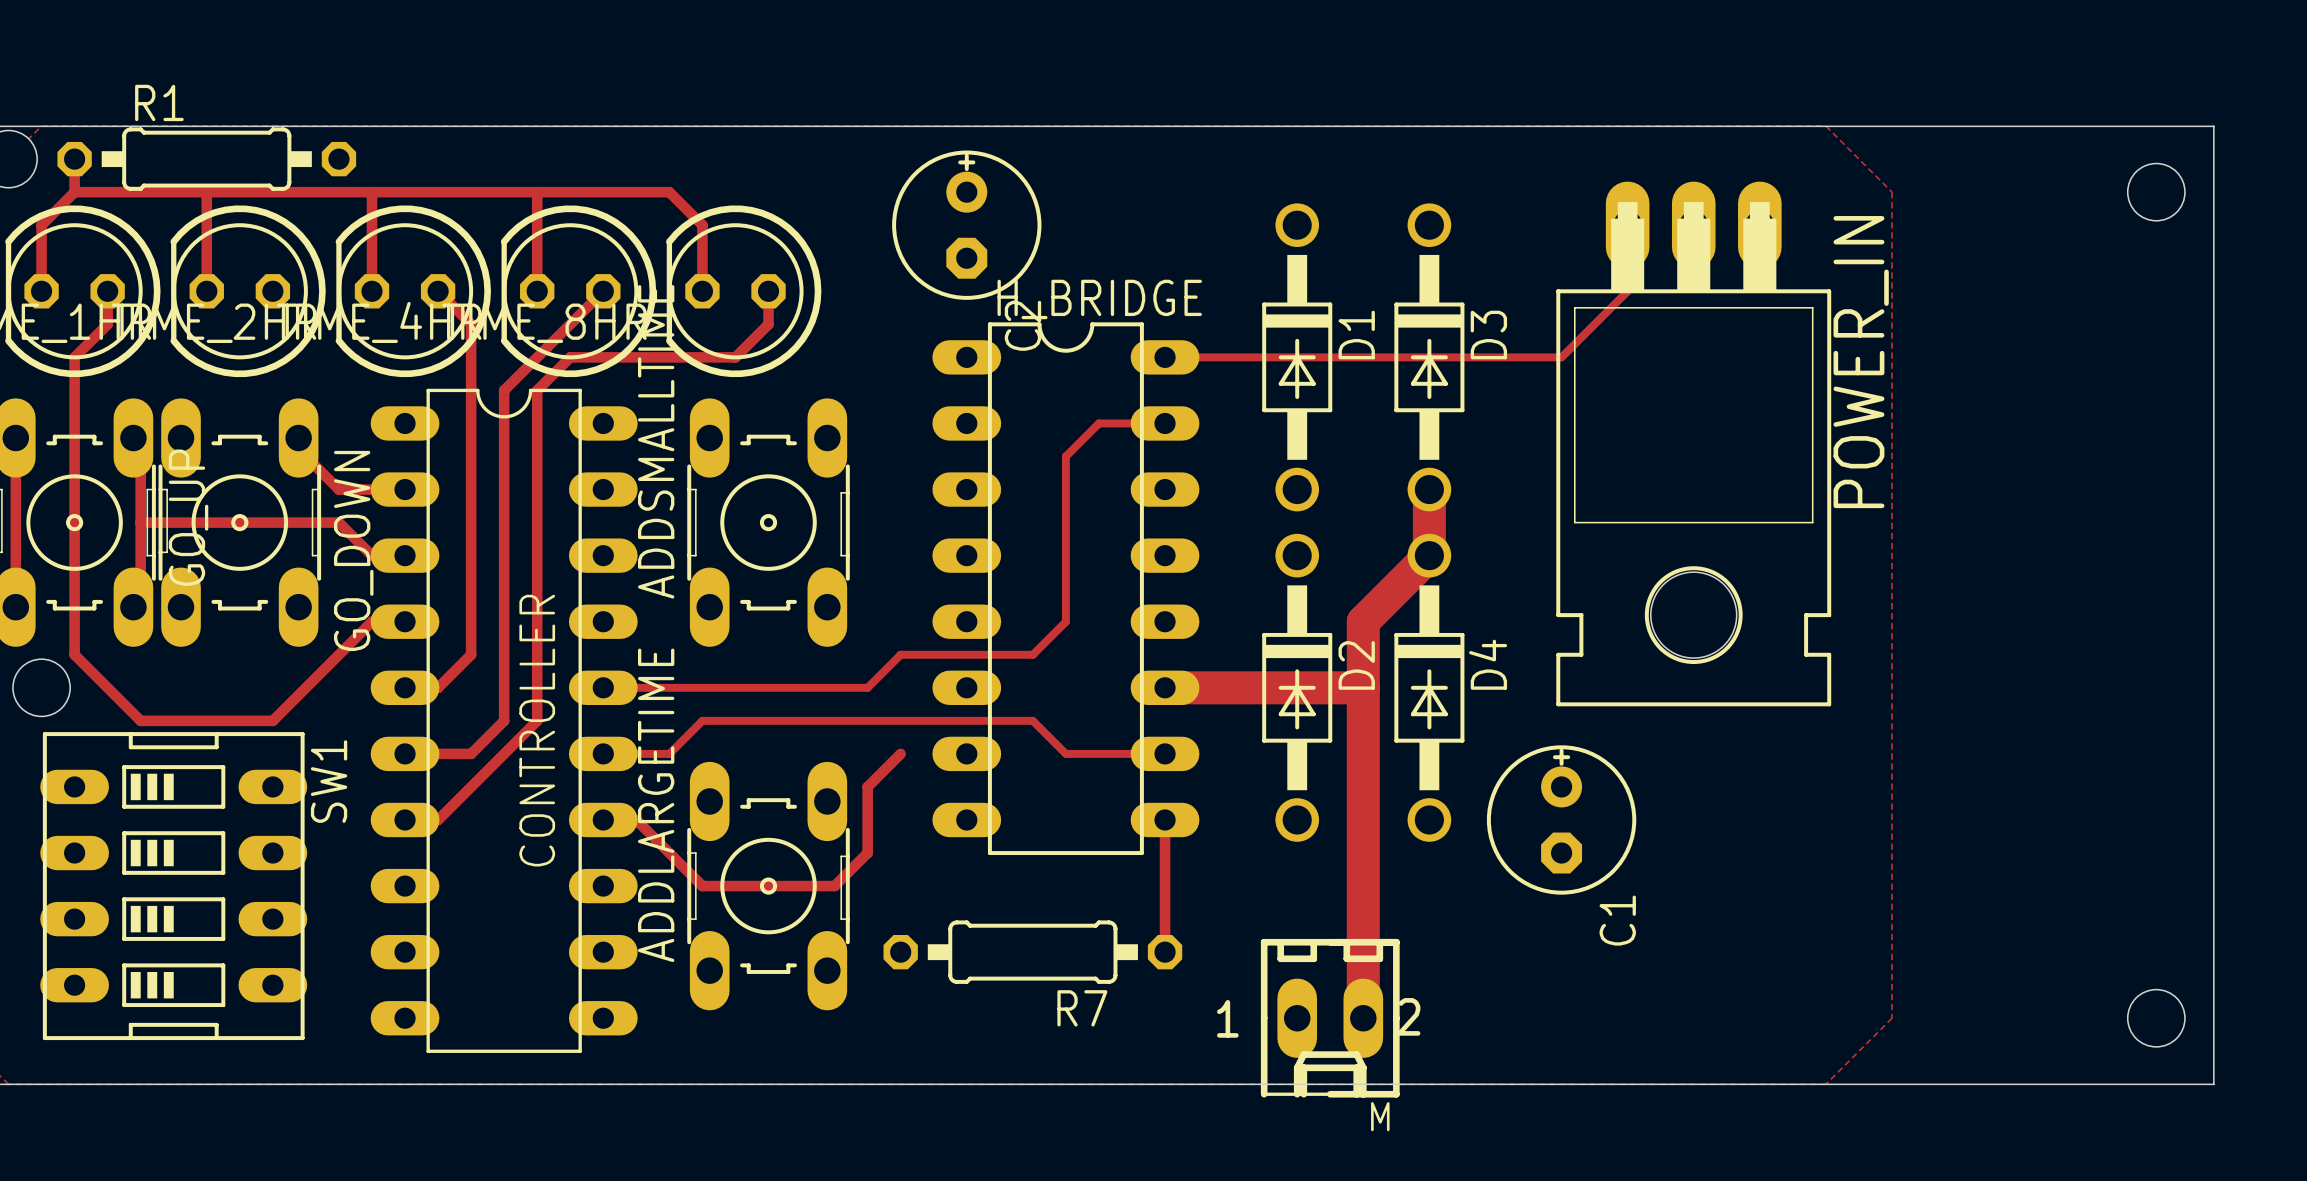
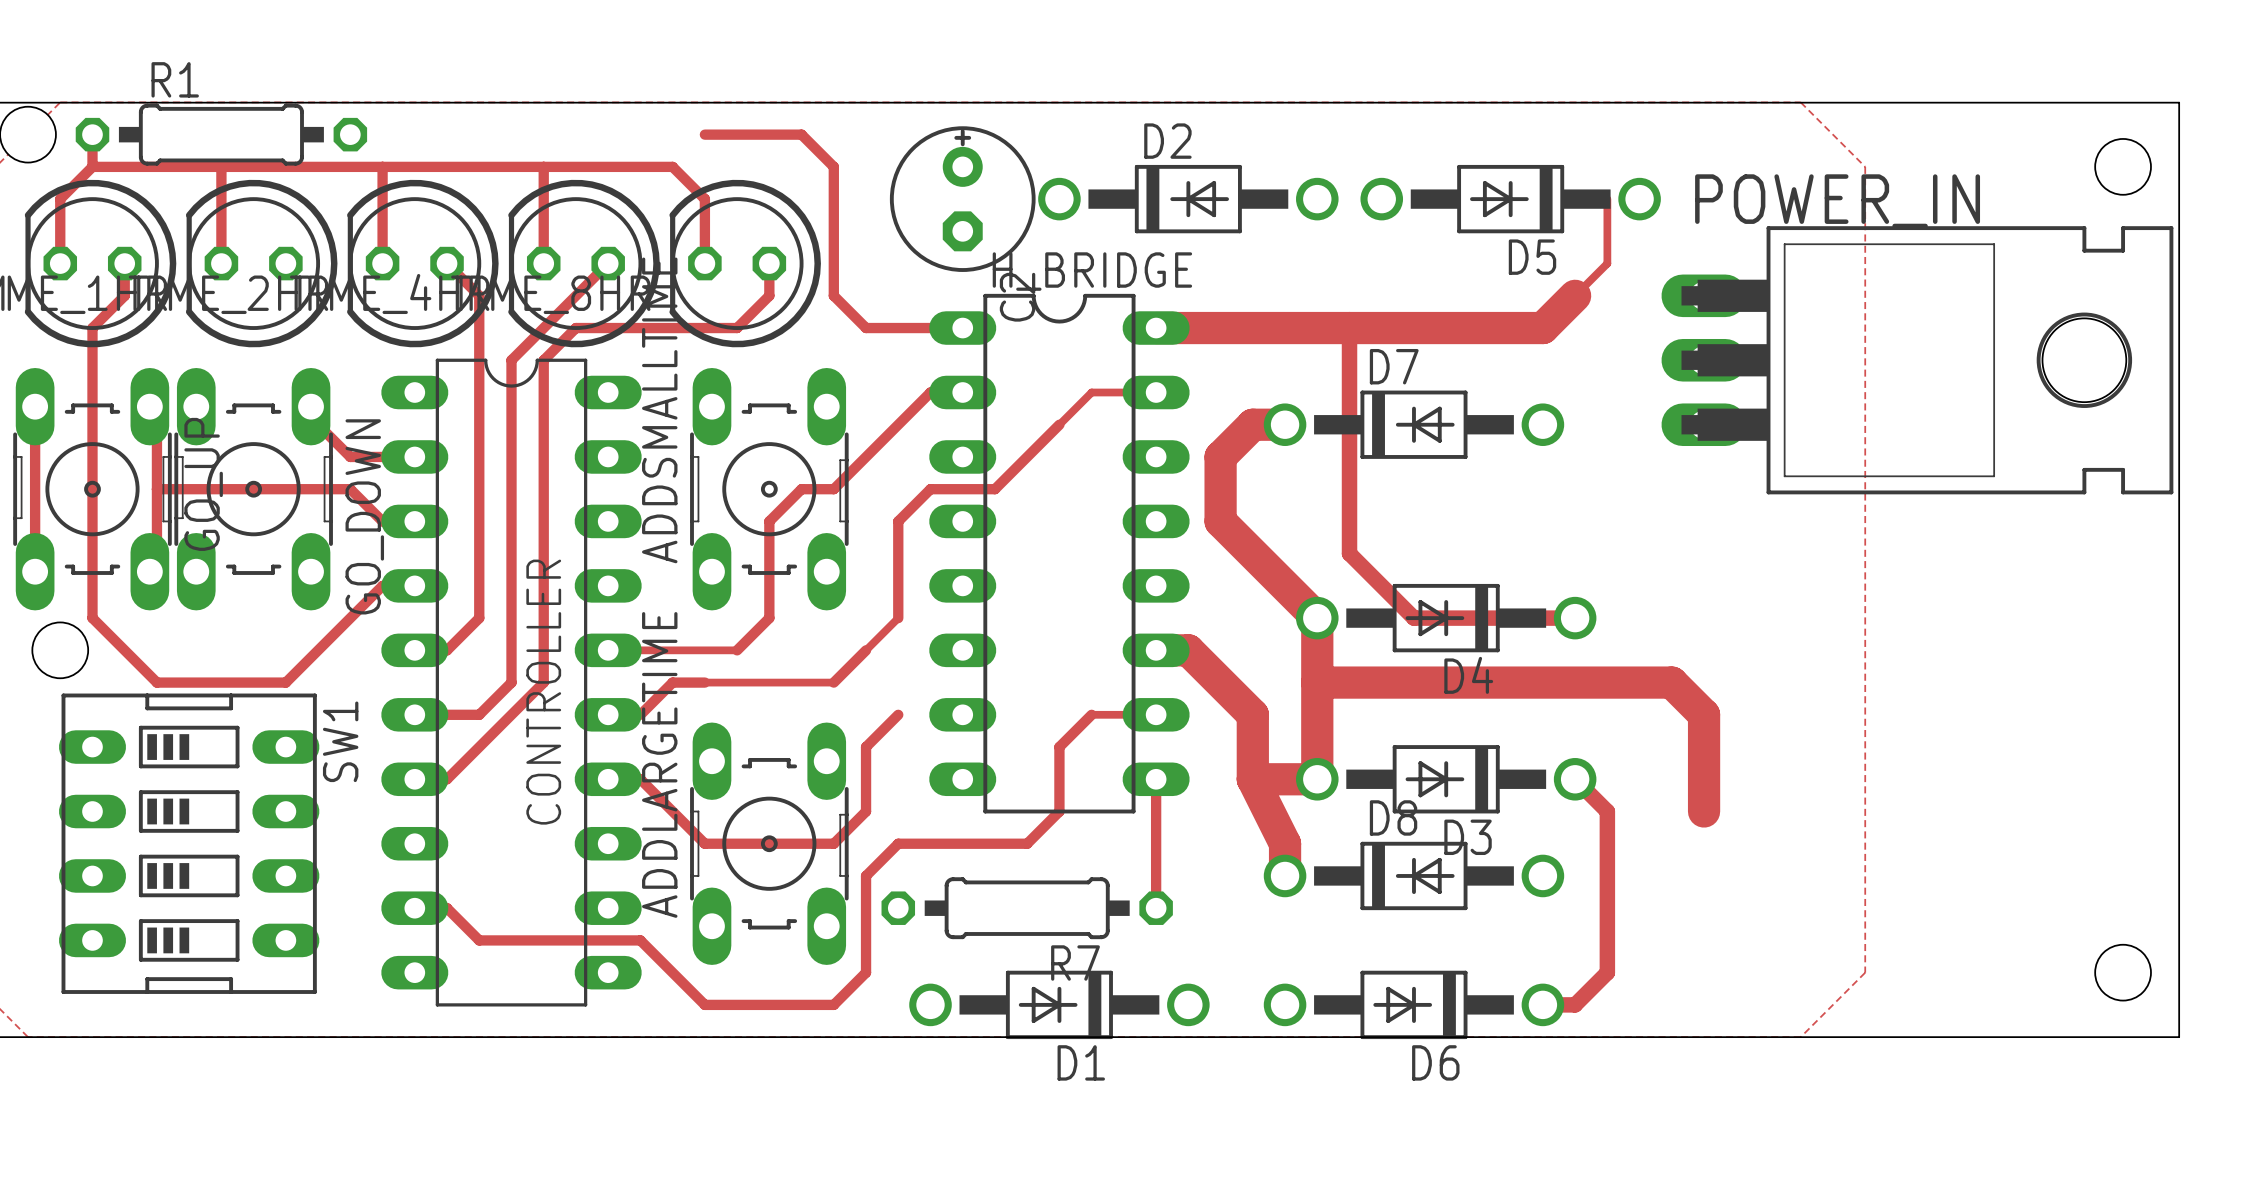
track: none -> (704, 134) (801, 134) (833, 166) (833, 295) (866, 328) (962, 328)
D5: none -> (1510, 199)
track width: thin (1594, 324) (1561, 357) (1165, 357) -> thick (1575, 295) (1542, 328) (1156, 328)
D1 rotation: 0° (1297, 357) -> 90° clockwise (1059, 1004)
D1 position: (1297, 357) -> (1059, 1004)
track: none -> (1349, 328) (1349, 553) (1413, 618) (1575, 618)
D3 rotation: 0° (1429, 357) -> 90° clockwise (1446, 779)
D3 position: (1429, 357) -> (1446, 779)
track: none -> (962, 392) (930, 392) (833, 489) (801, 489) (769, 521) (769, 618) (737, 650)
POWER_IN rotation: 0° (1693, 443) -> 90° counterclockwise (1917, 360)
track: (1065, 456) (1065, 621) (1032, 654) (900, 654) -> (1059, 424) (994, 489) (930, 489) (898, 521) (898, 618)
track: none -> (1285, 424) (1252, 424) (1220, 456) (1220, 521) (1317, 618) (1317, 779) (1252, 779)
D7: none -> (1413, 424)
track: (1429, 489) (1429, 555) (1363, 621) (1363, 1018) -> none
track: (735, 687) (867, 687) -> (833, 682) (866, 650)
track: (1198, 687) (1363, 687) -> (1188, 650) (1252, 714) (1252, 779)
D2 rotation: 0° (1297, 687) -> 90° counterclockwise (1188, 199)
D2 position: (1297, 687) -> (1188, 199)
D4 rotation: 0° (1429, 687) -> 90° clockwise (1446, 618)
track: (702, 720) (669, 753) (636, 753) -> (704, 682) (672, 682) (640, 714)
track: (834, 720) (1032, 720) (1065, 753) (1098, 753) -> (414, 908) (447, 908) (479, 940) (640, 940) (704, 1004) (833, 1004) (866, 972) (866, 875) (898, 843) (1027, 843) (1059, 811) (1059, 747) (1091, 714)
track: none -> (1317, 682) (1671, 682) (1704, 714) (1704, 811)
track: none -> (1252, 779) (1285, 843) (1285, 875)
C1: (1561, 819) -> none
track: none -> (1575, 779) (1607, 811) (1607, 972) (1575, 1004) (1542, 1004)
D8: none -> (1413, 875)
M: (1330, 1018) -> none
D6: none -> (1413, 1004)

